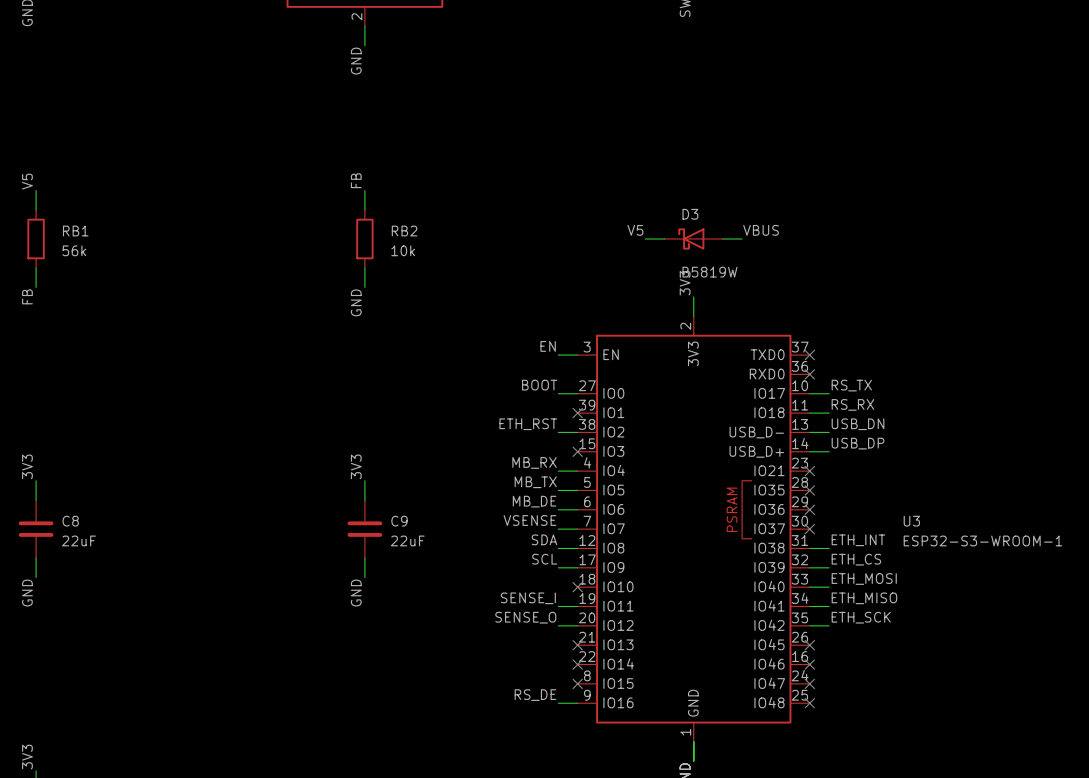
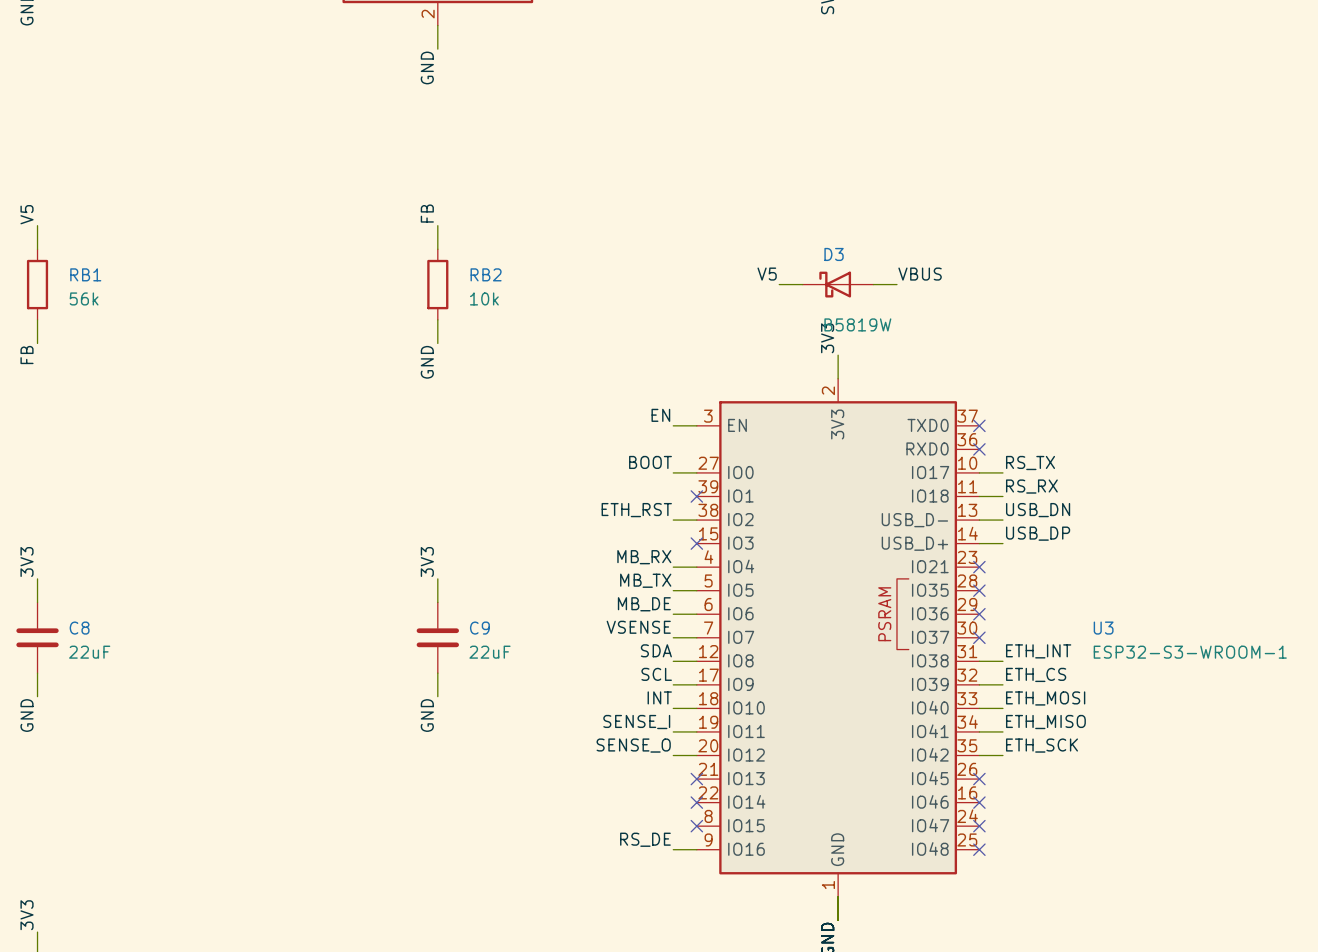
label: none -> INT (659, 697)
wire: none -> (673, 708) (696, 708)
no-connect mark: (577, 587) -> none

